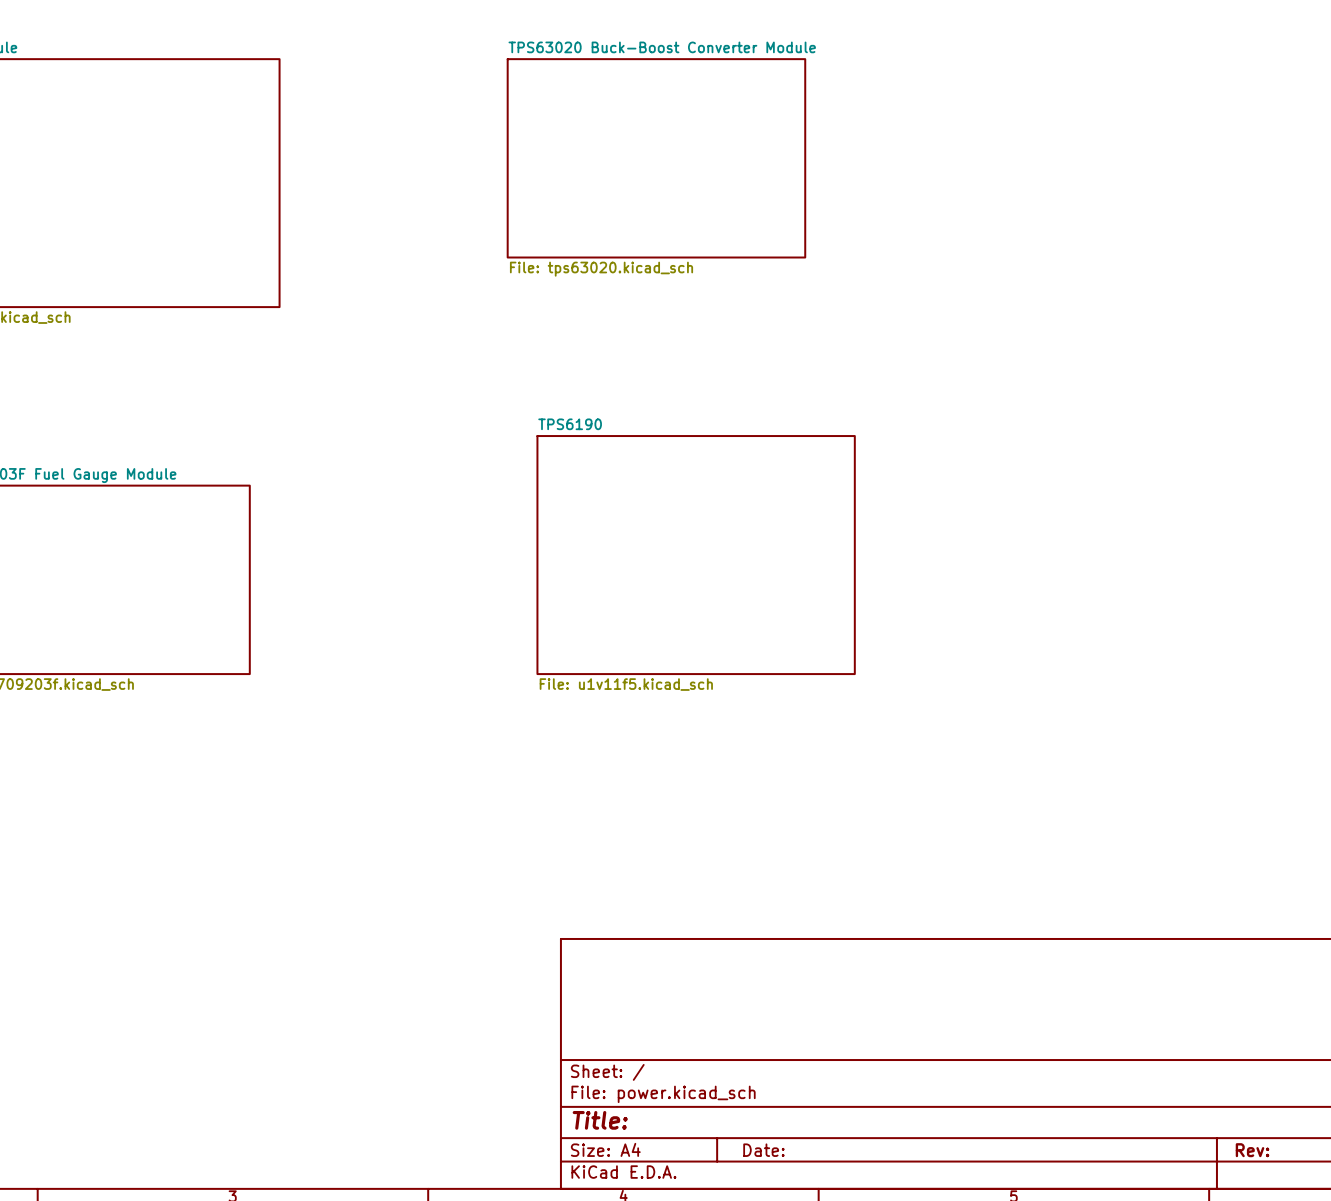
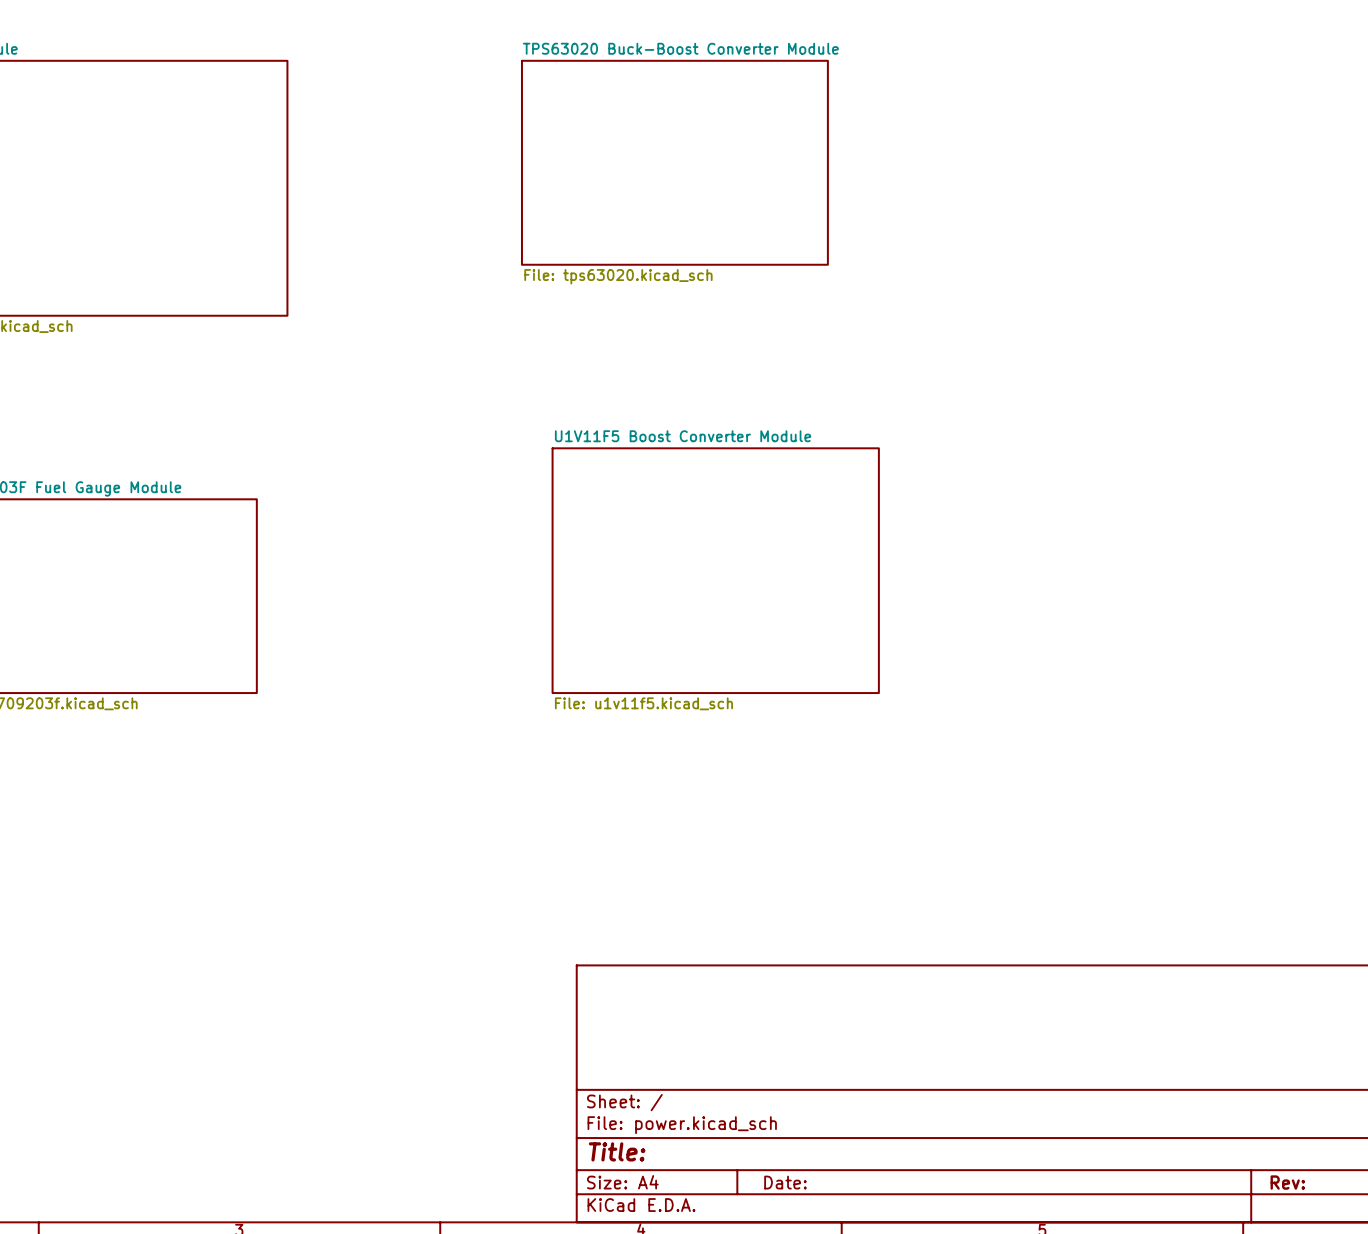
sheet TPS6190 name: TPS6190 (570, 424) -> U1V11F5 Boost Converter Module (683, 436)

